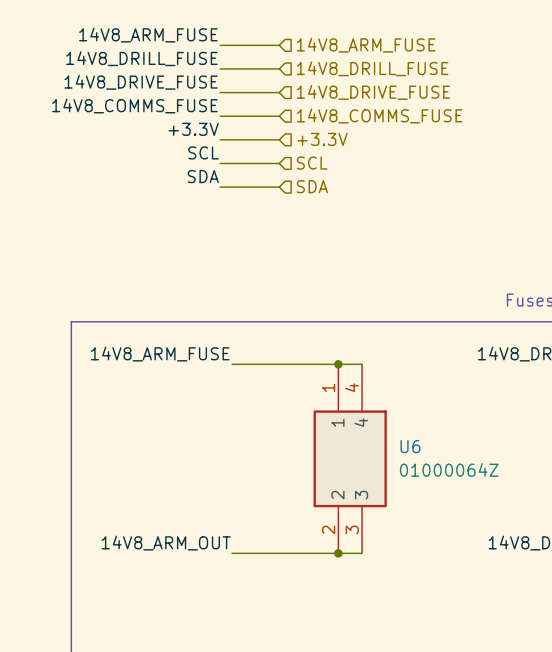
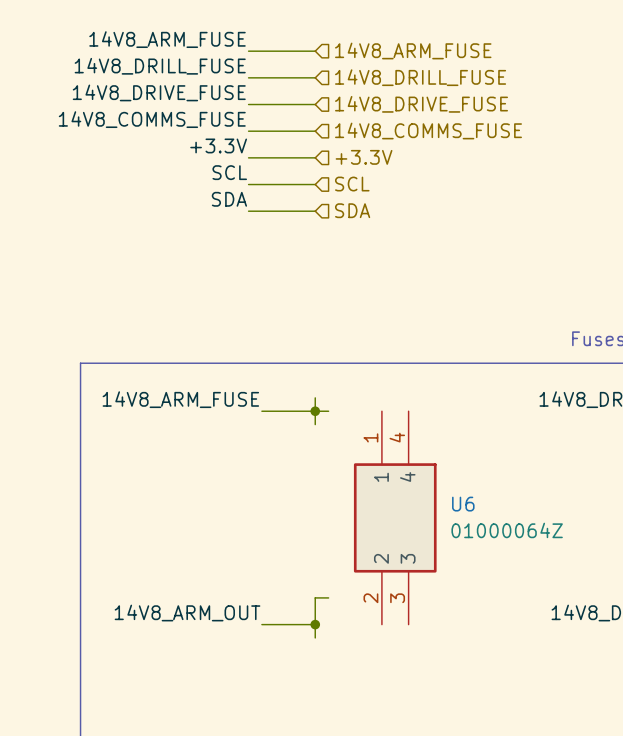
wire: none -> (315, 397) (315, 424)
junction: none -> (315, 411)
wire: (291, 364) (361, 364) -> none
junction: (338, 364) -> none
wire: none -> (328, 597) (315, 597) (315, 637)
wire: (279, 553) (361, 553) -> none
junction: none -> (315, 624)
junction: (338, 553) -> none

